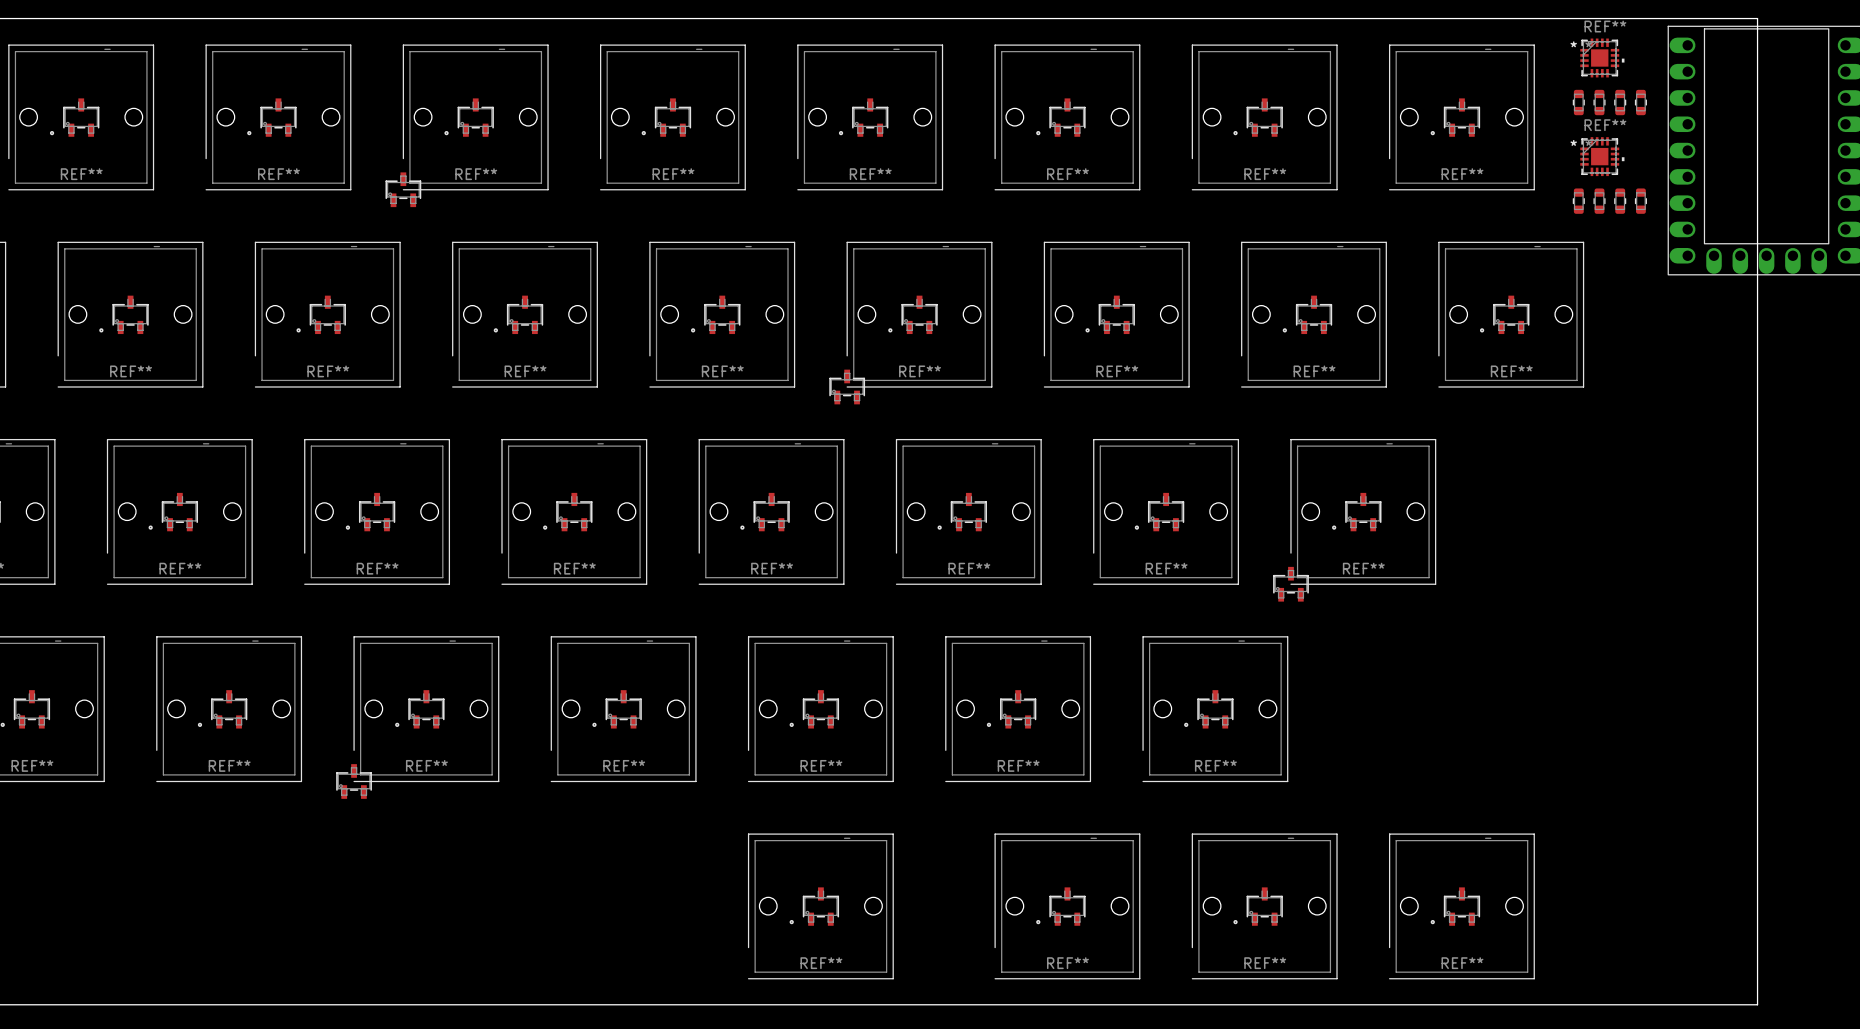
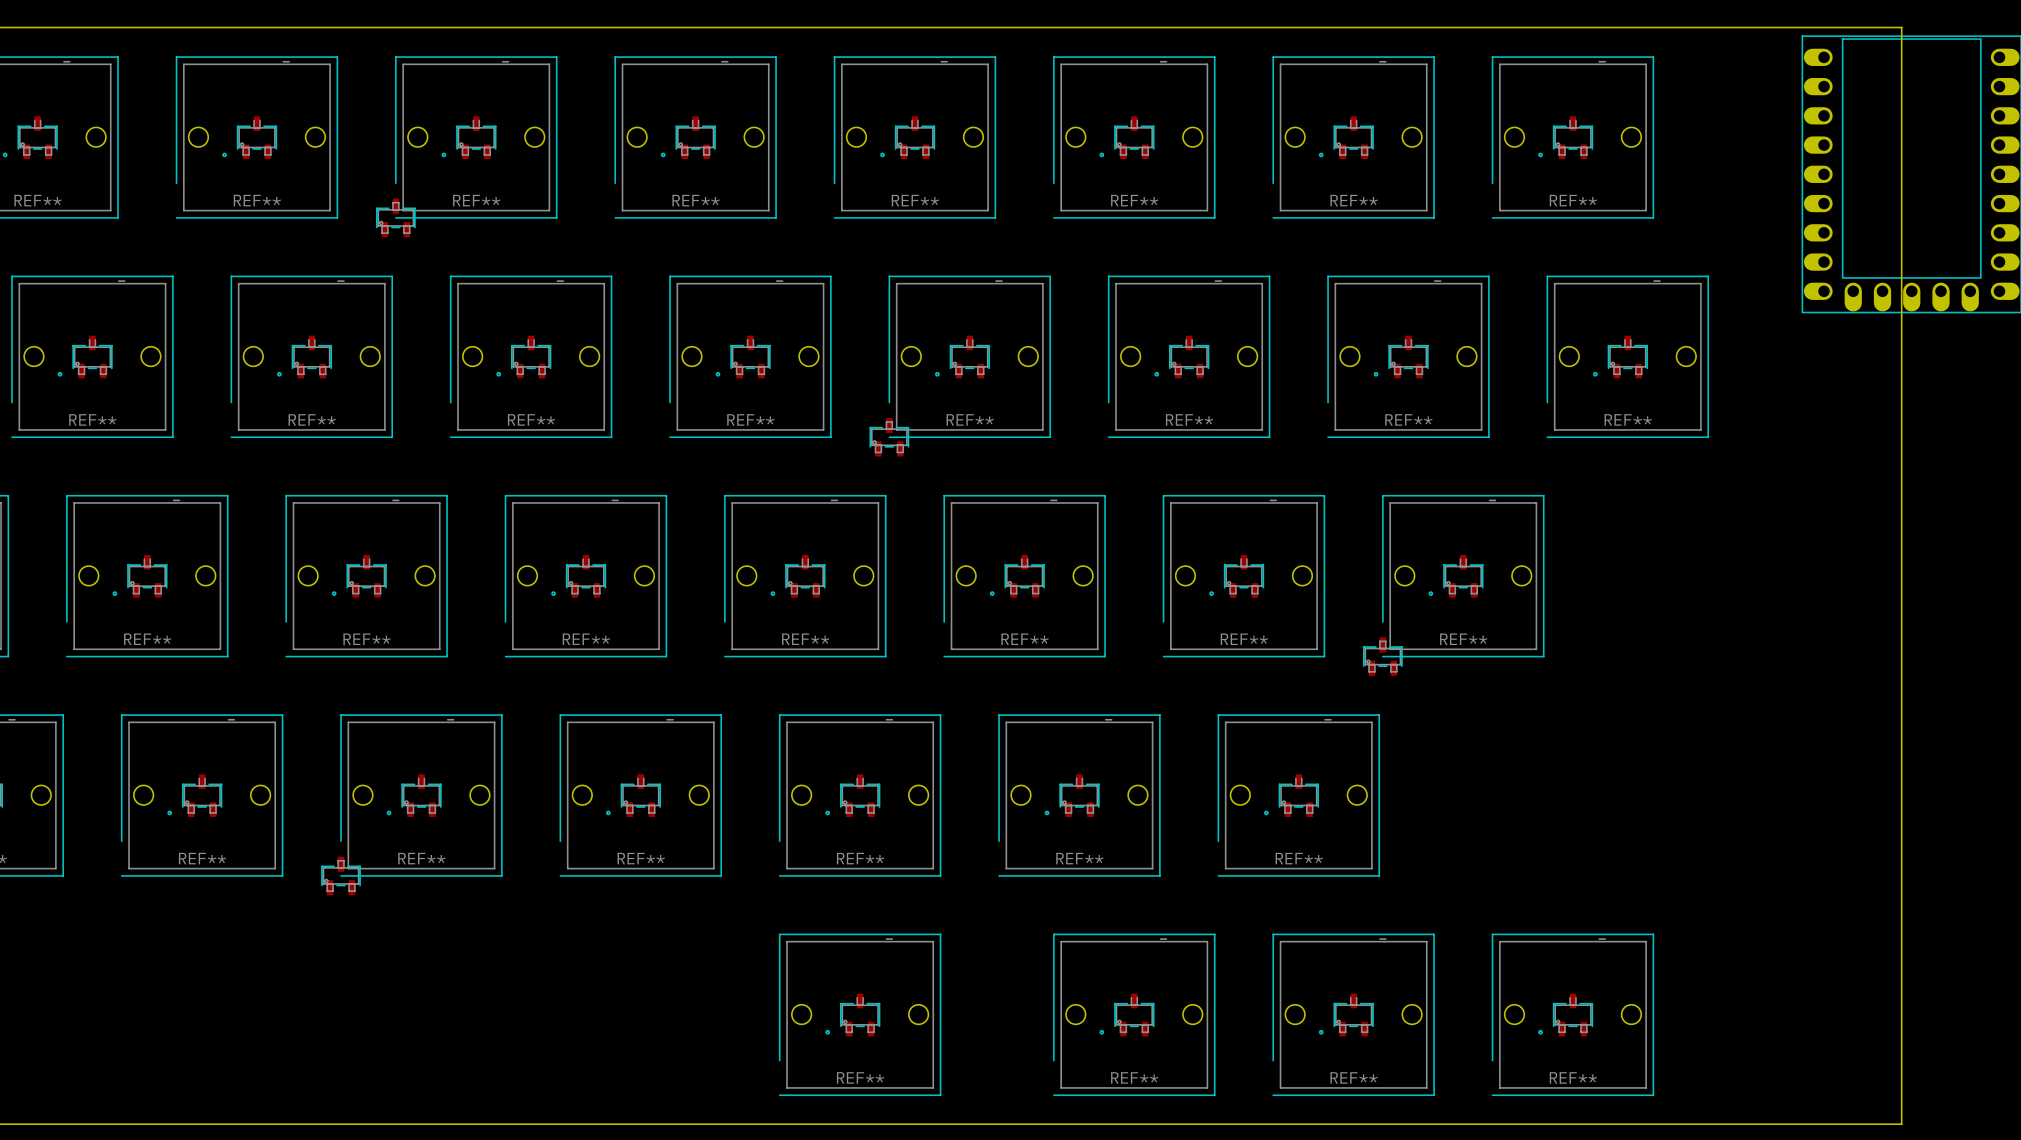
REF**: (1609, 76) -> none
REF**: (1609, 175) -> none

